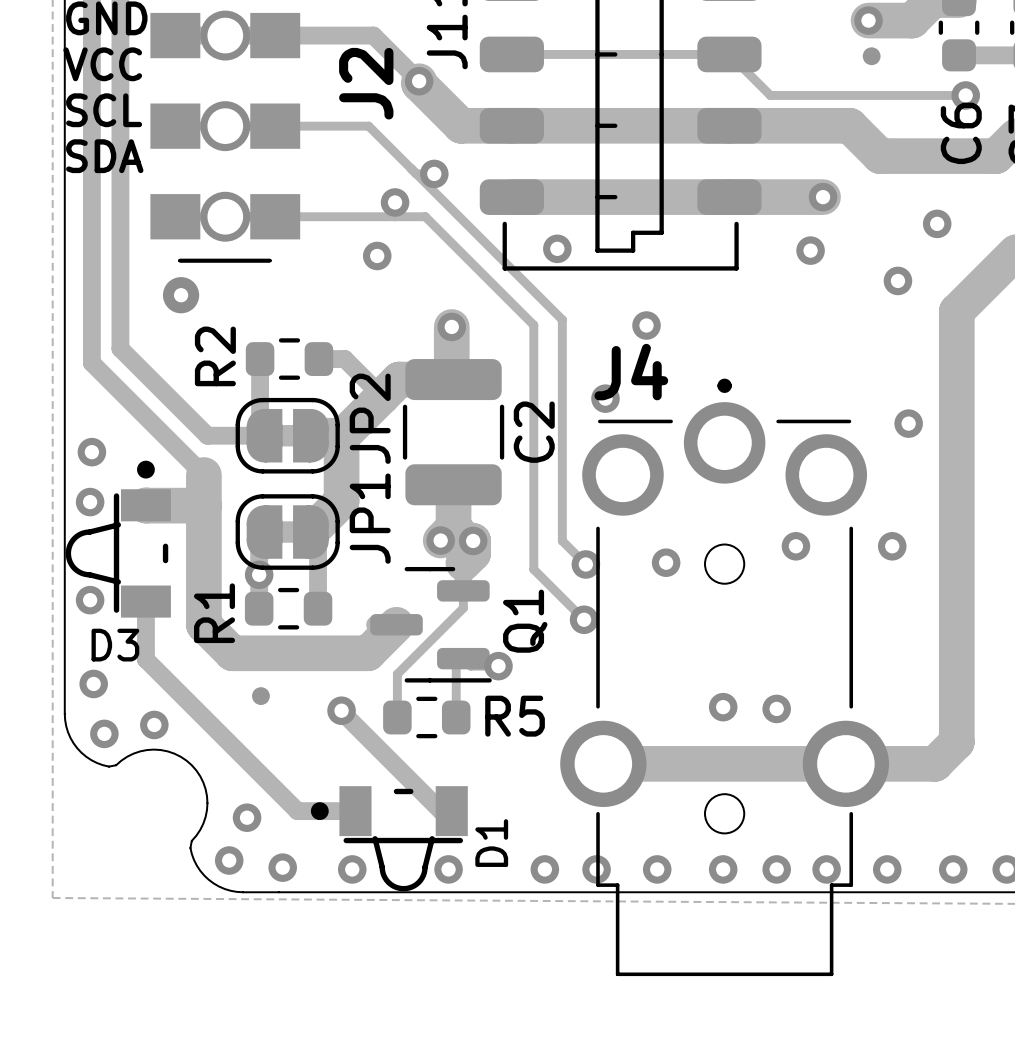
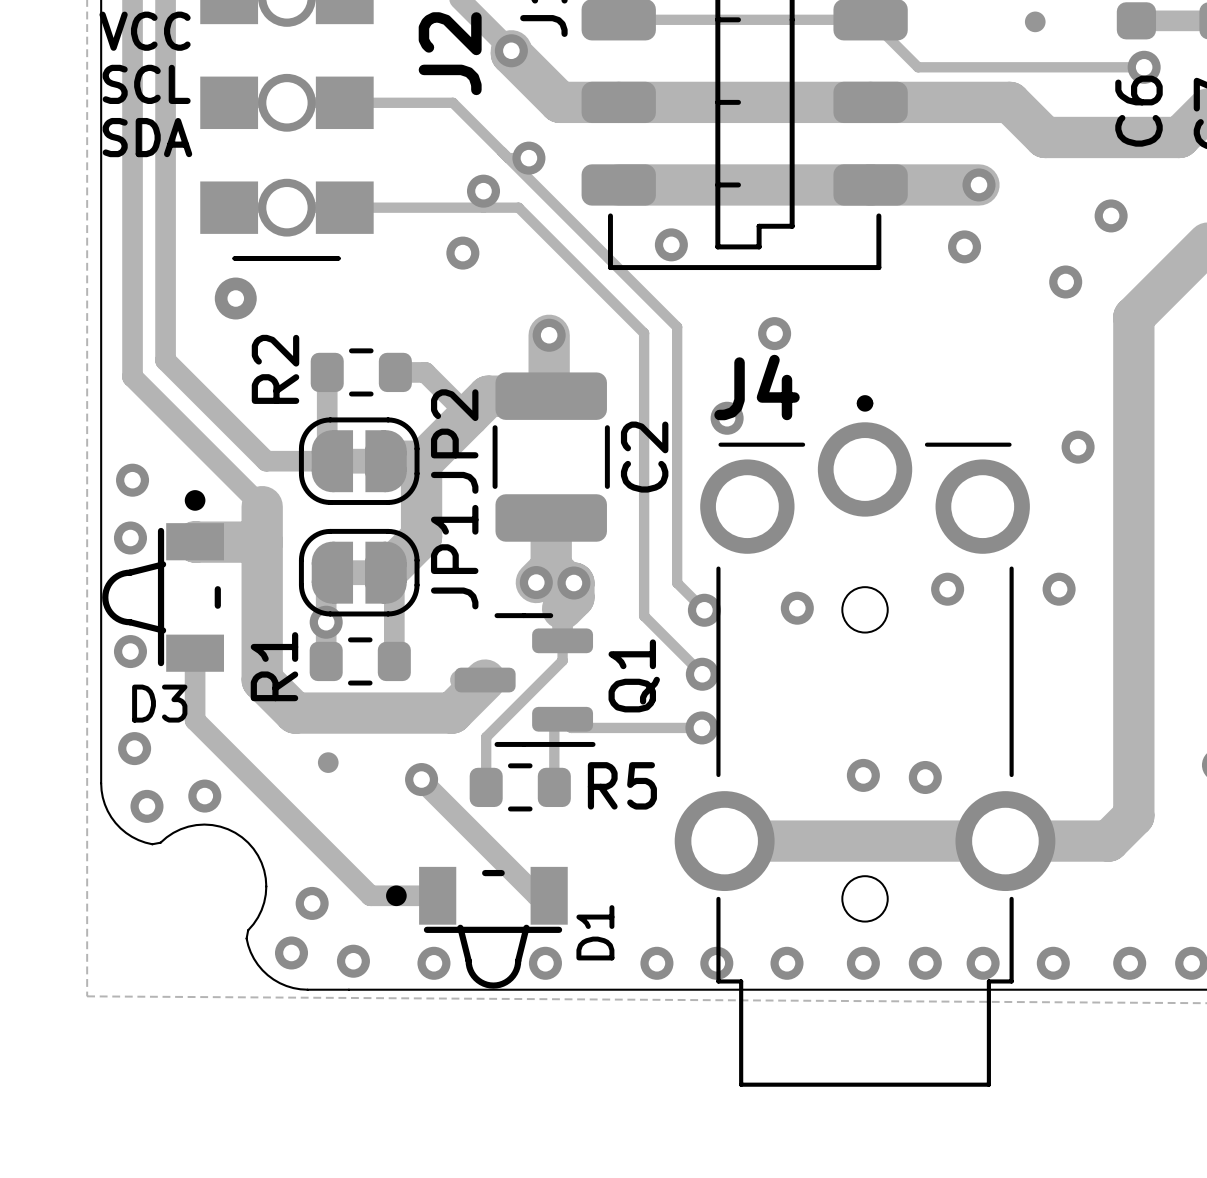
track: none -> (603, 727) (701, 727)
via position: (498, 666) -> (701, 727)

